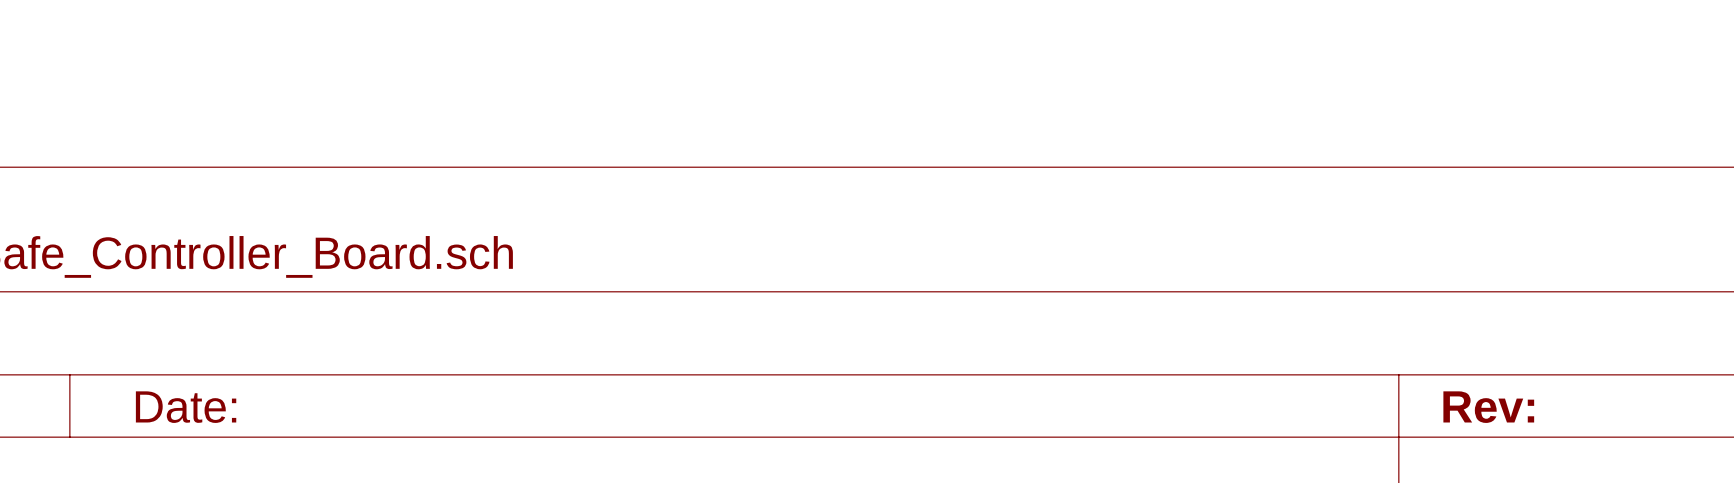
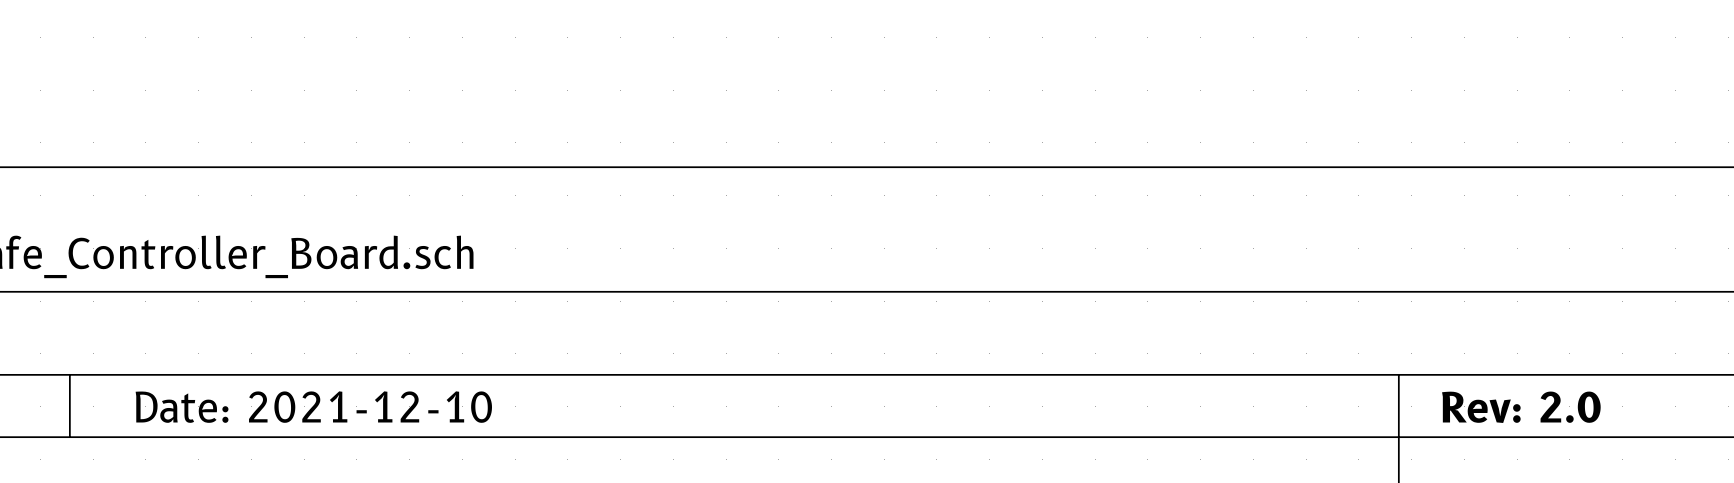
title block: Date: (186, 407) -> Date: 2021-12-10 (313, 407)
title block: Rev: (1488, 407) -> Rev: 2.0 (1521, 407)

